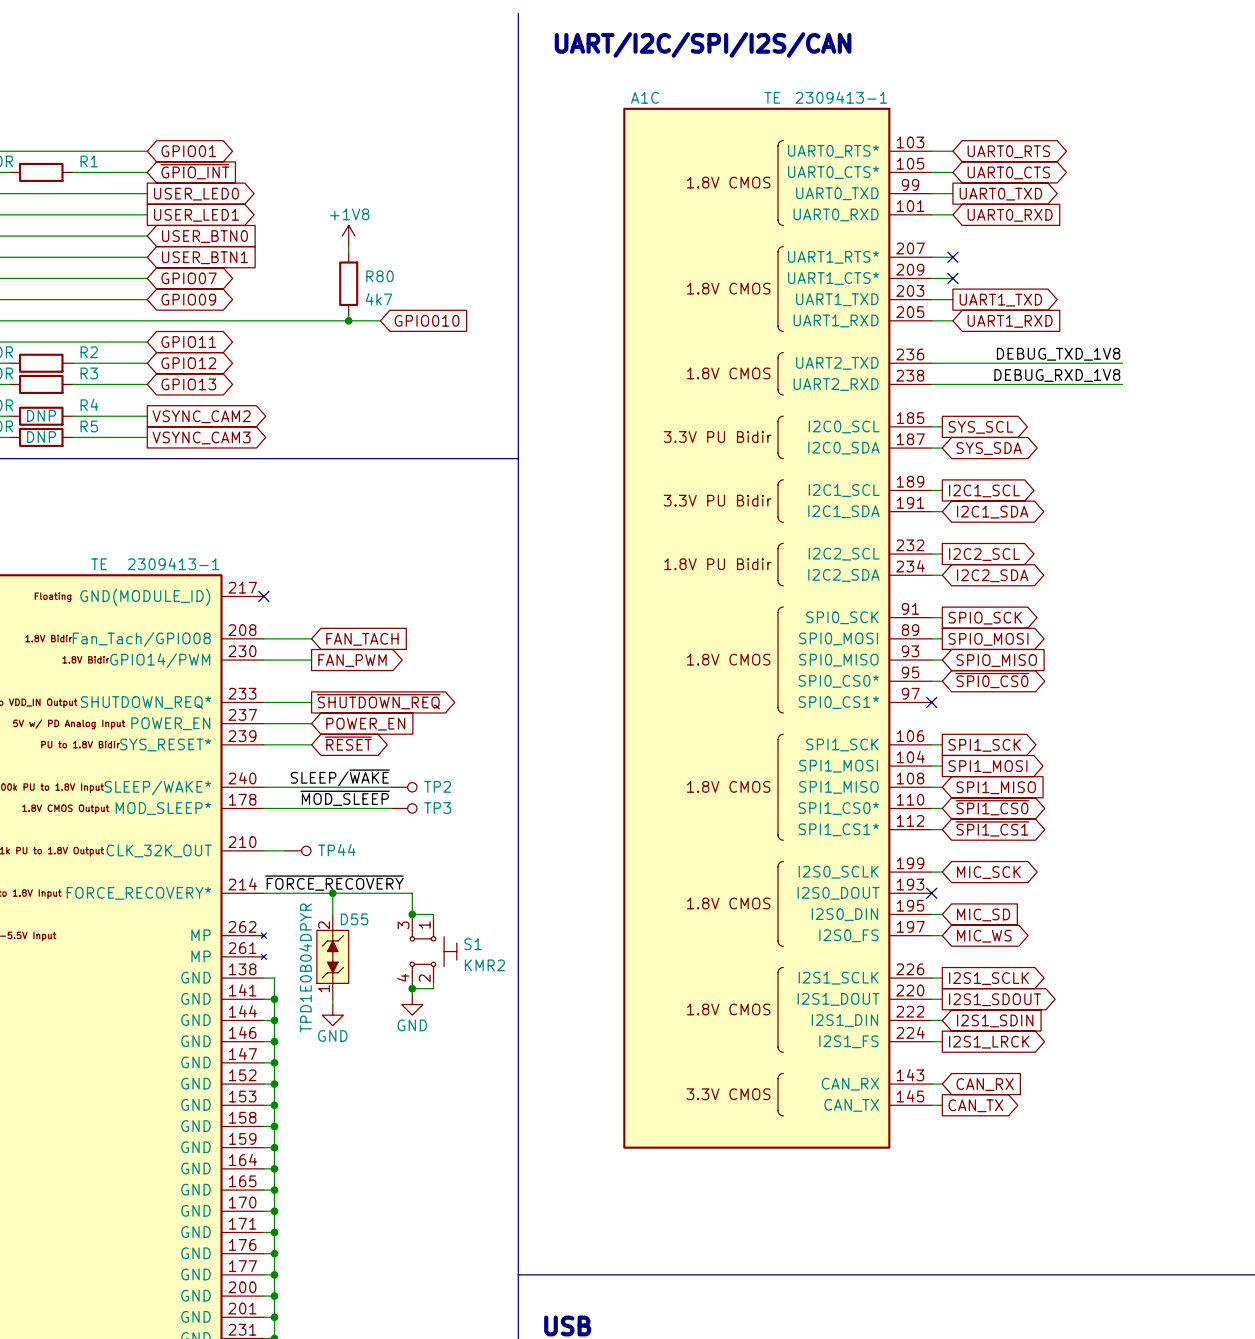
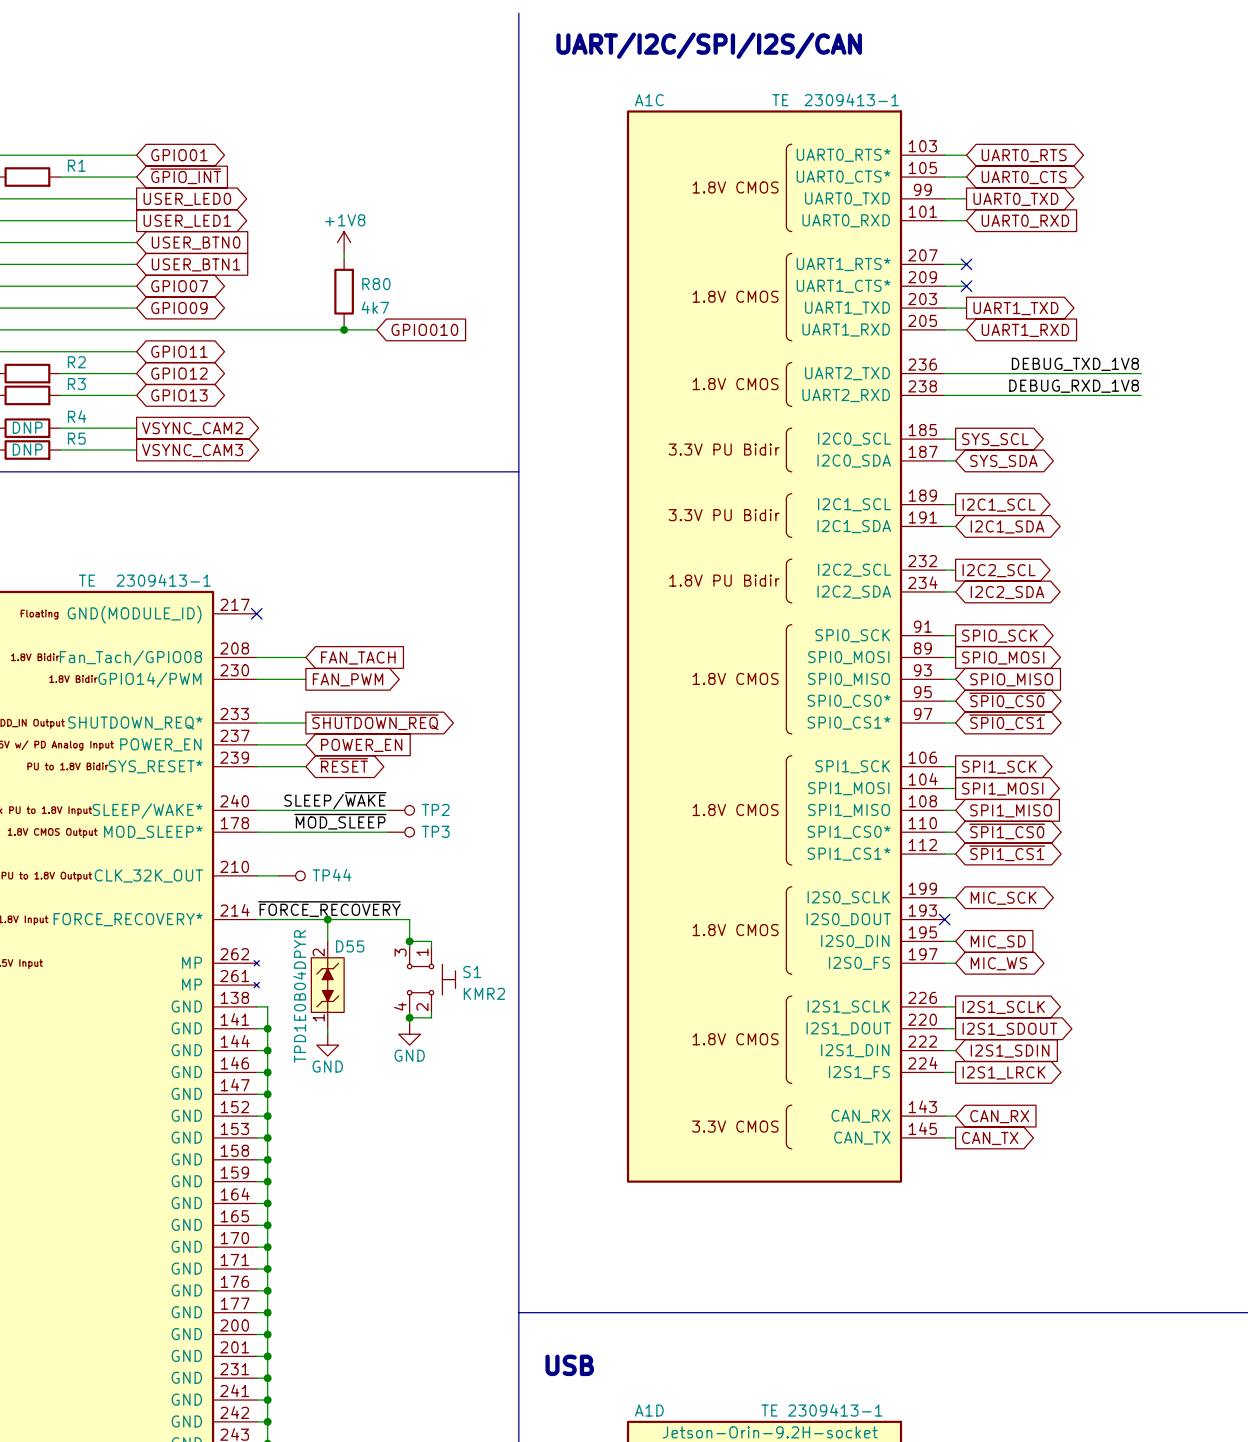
global label: none -> ~{SPI0_CS1} (1007, 722)
wire: none -> (944, 723) (955, 723)
no-connect mark: (931, 702) -> none

